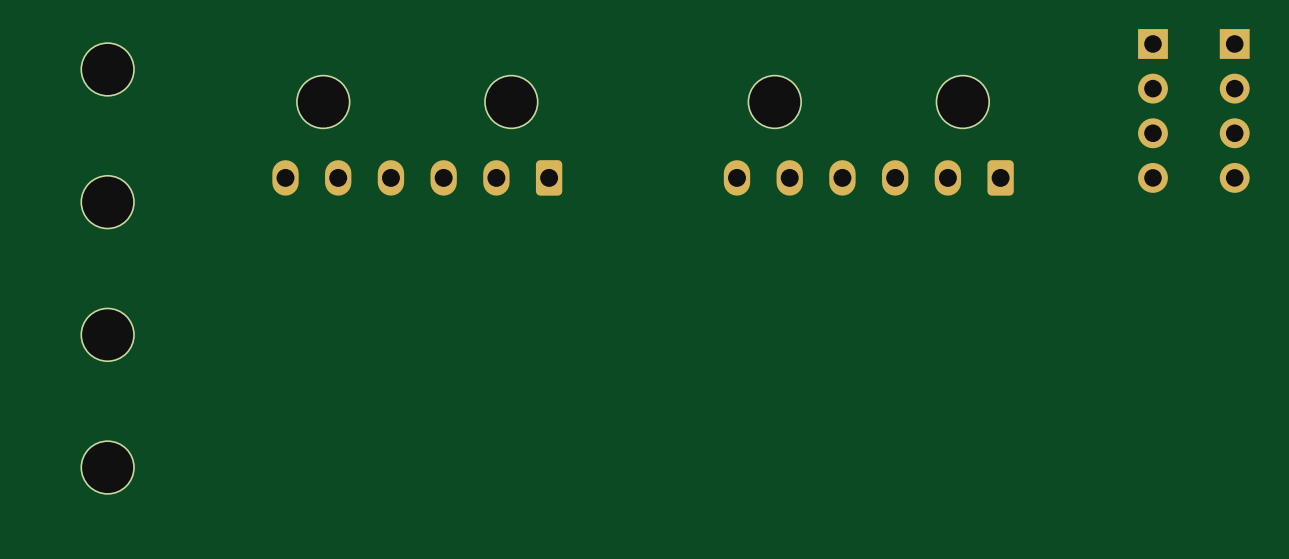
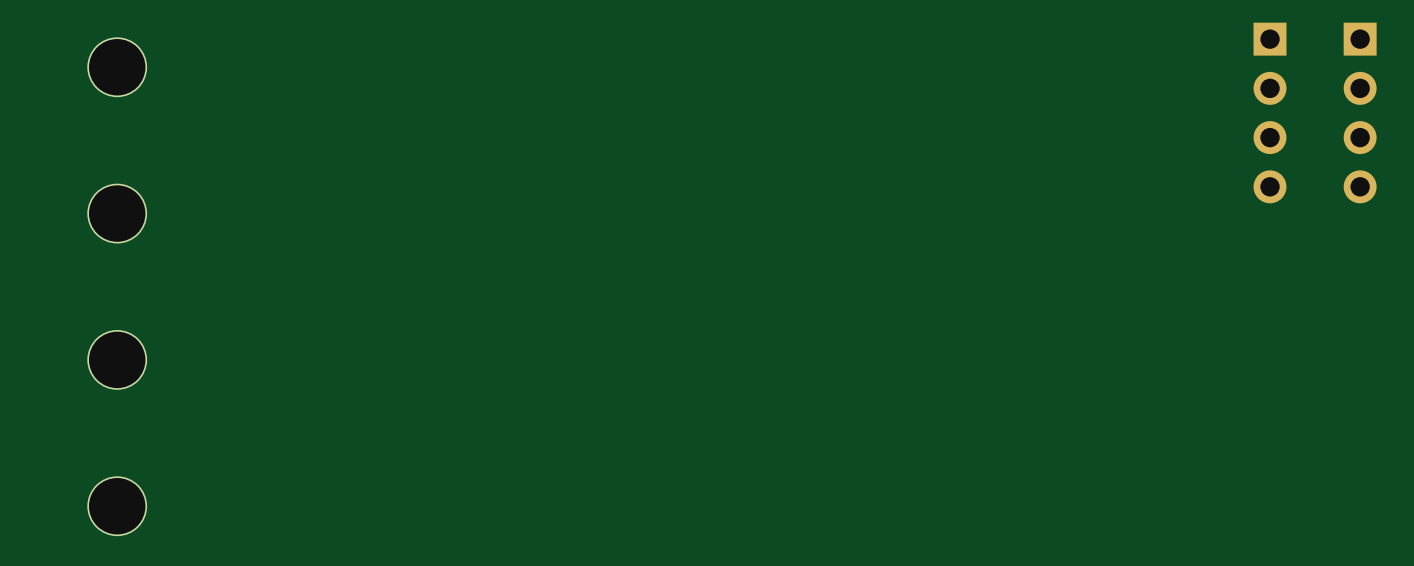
part: (417, 135) -> none
part: (868, 135) -> none

